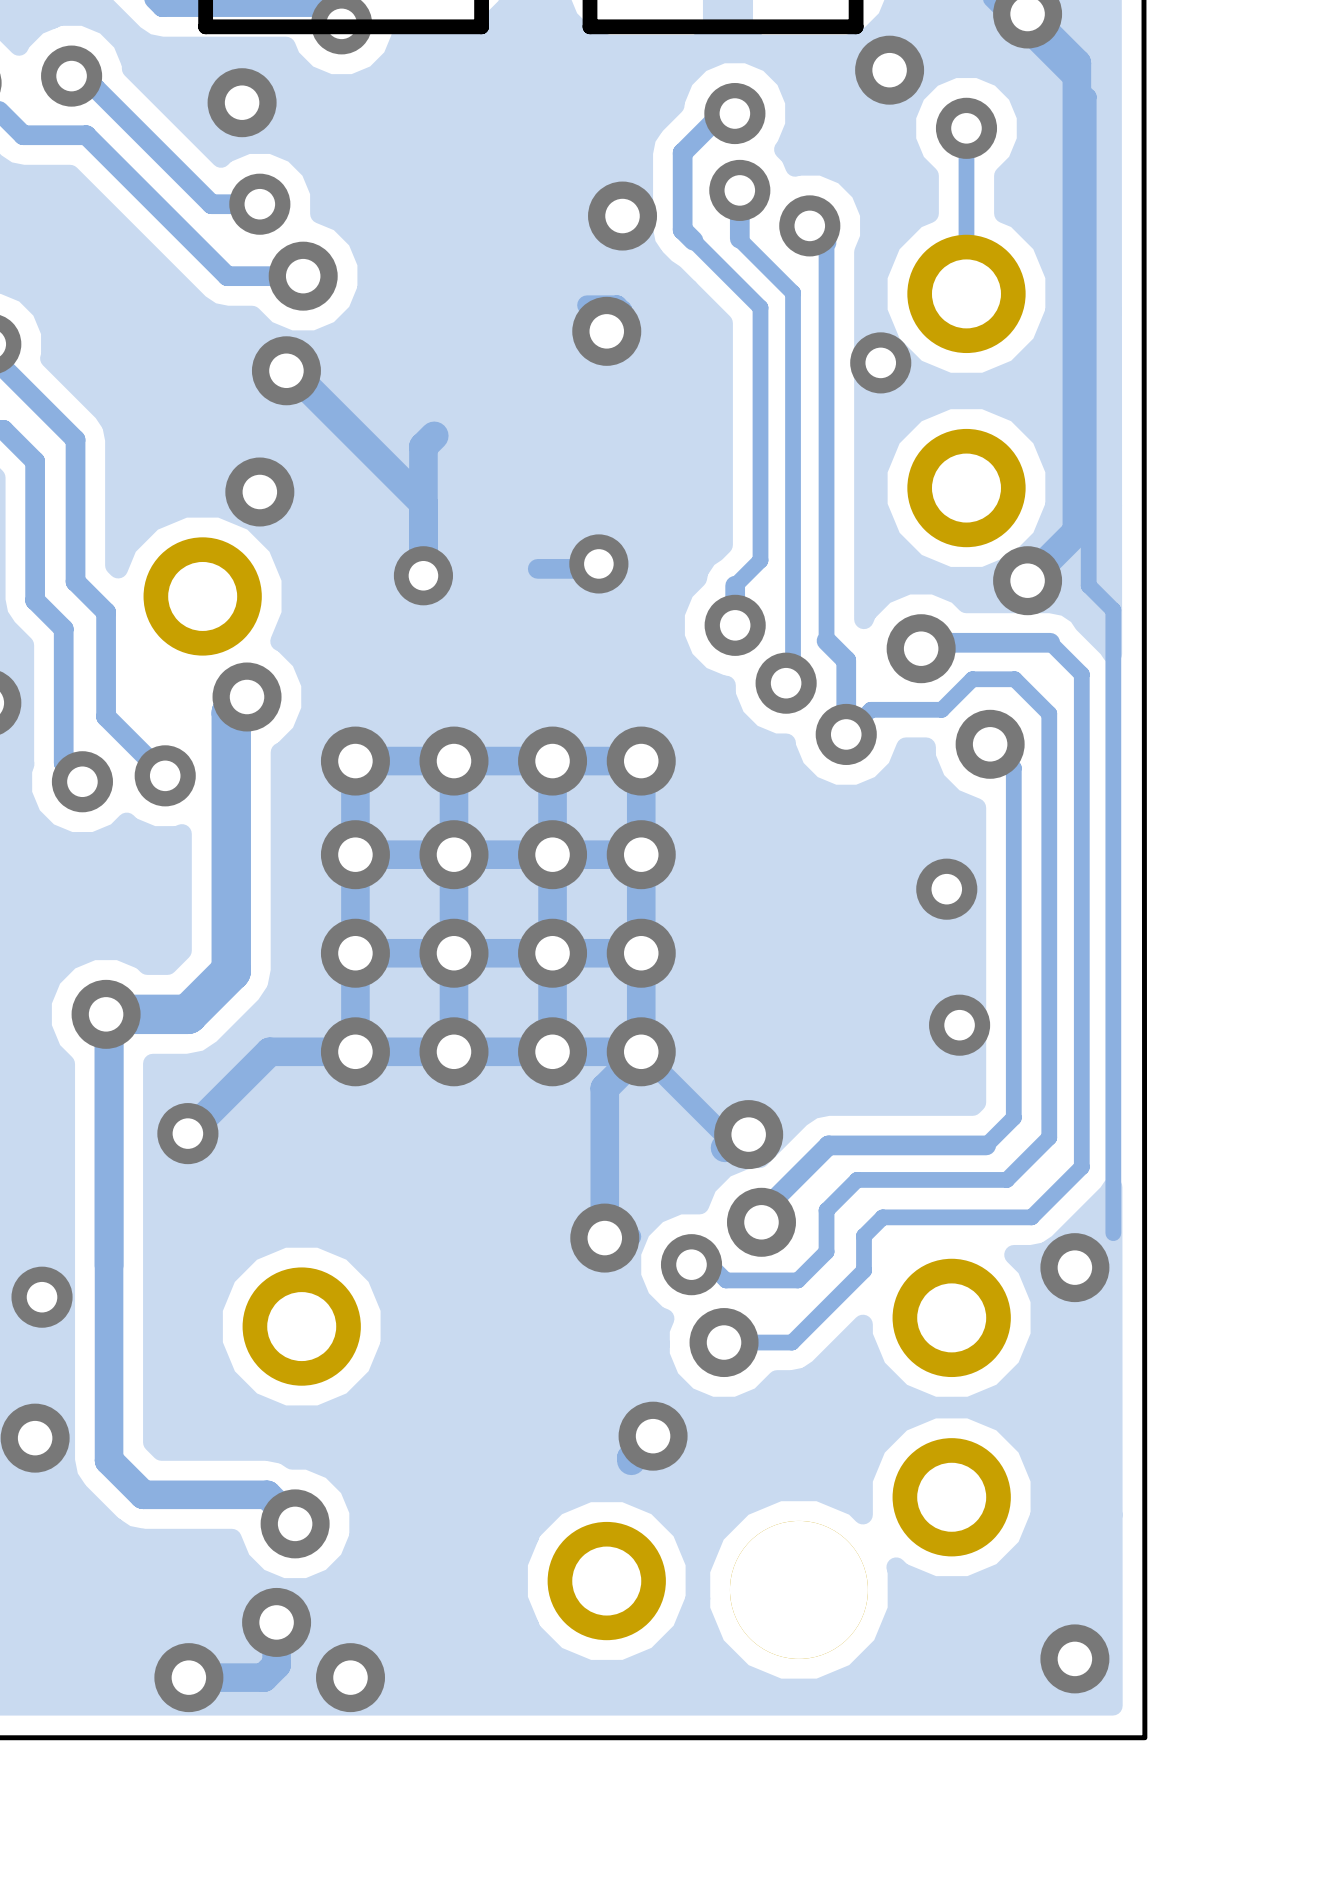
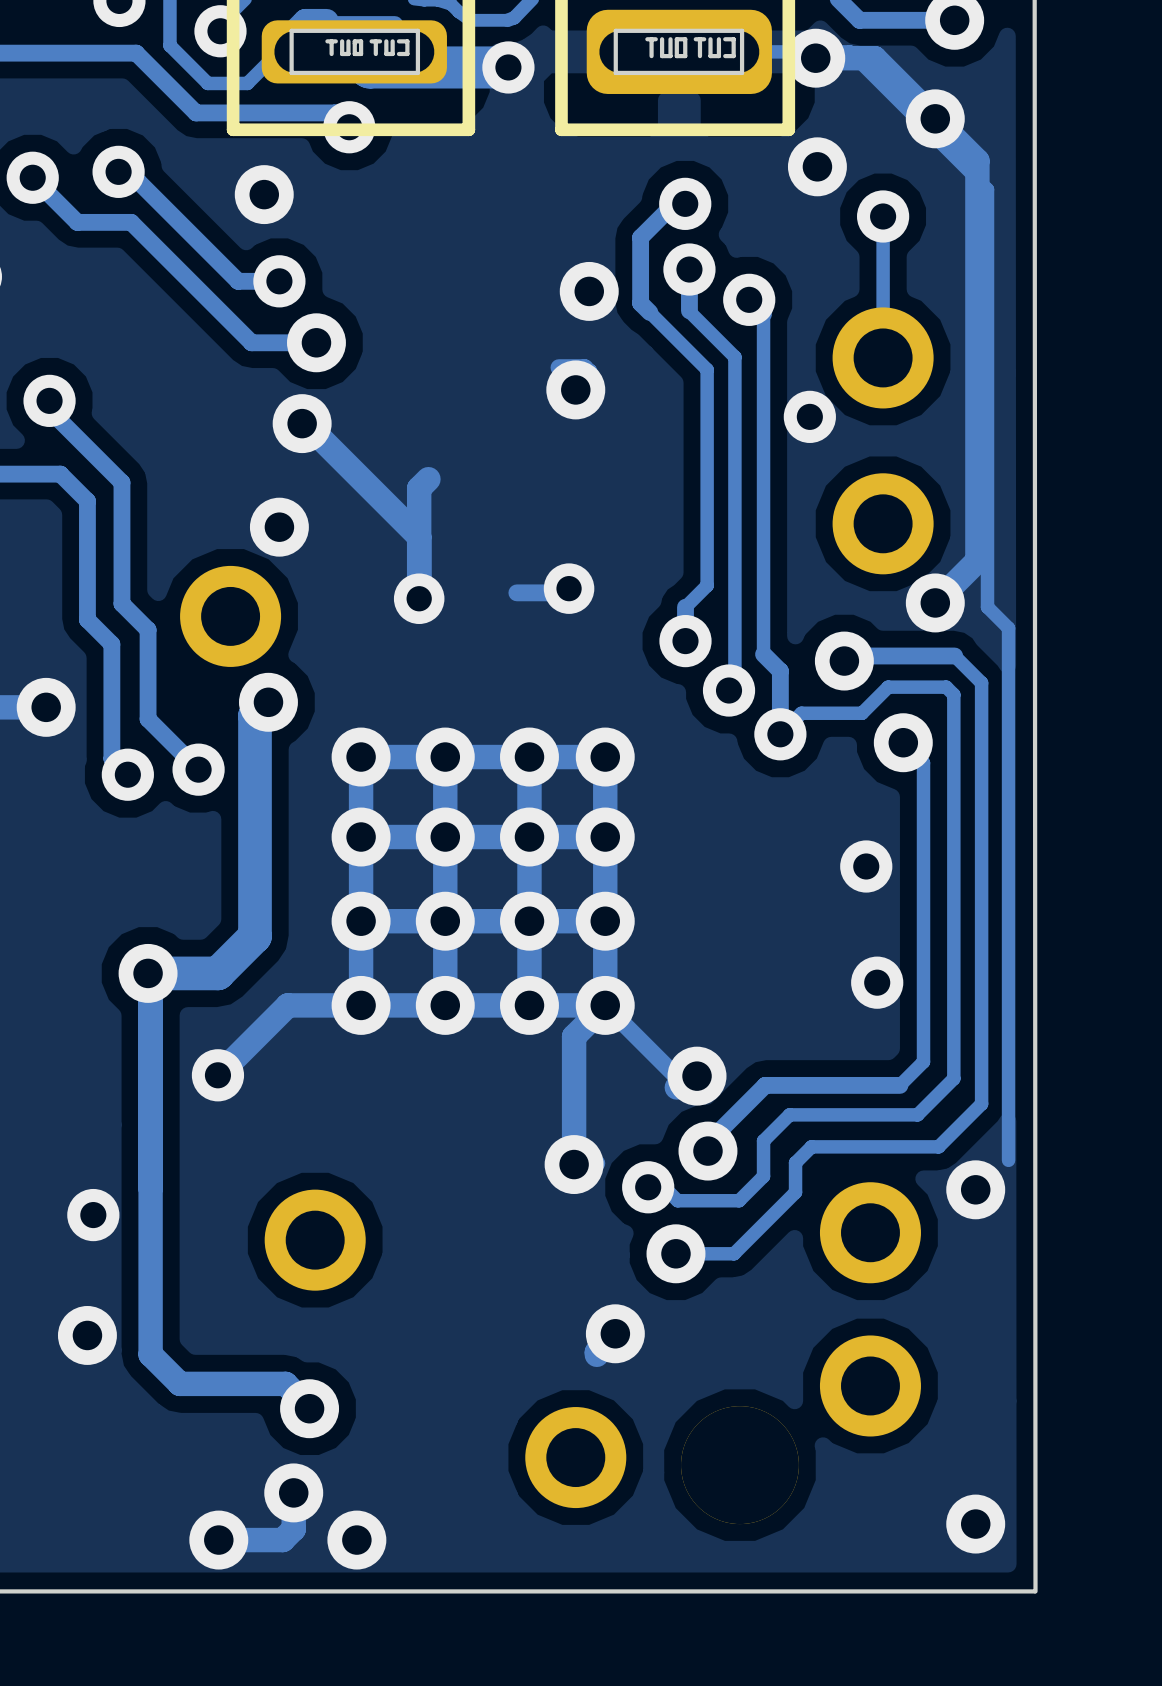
track: (1014, 679) (1049, 713) -> (924, 687) (946, 687) (953, 694) (953, 716)

